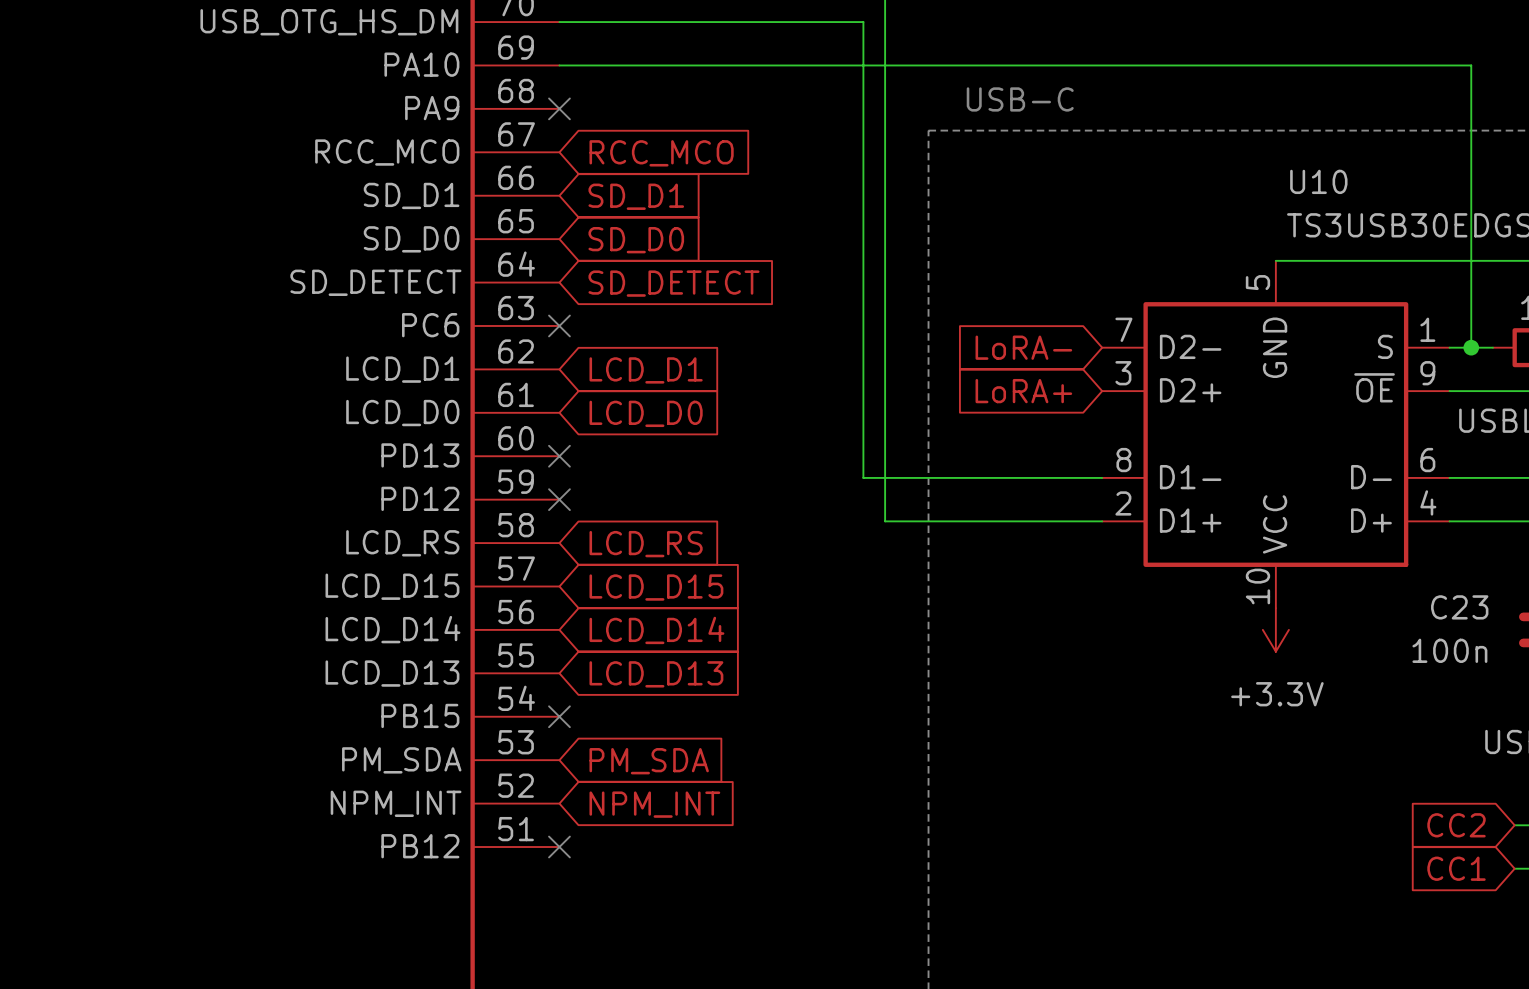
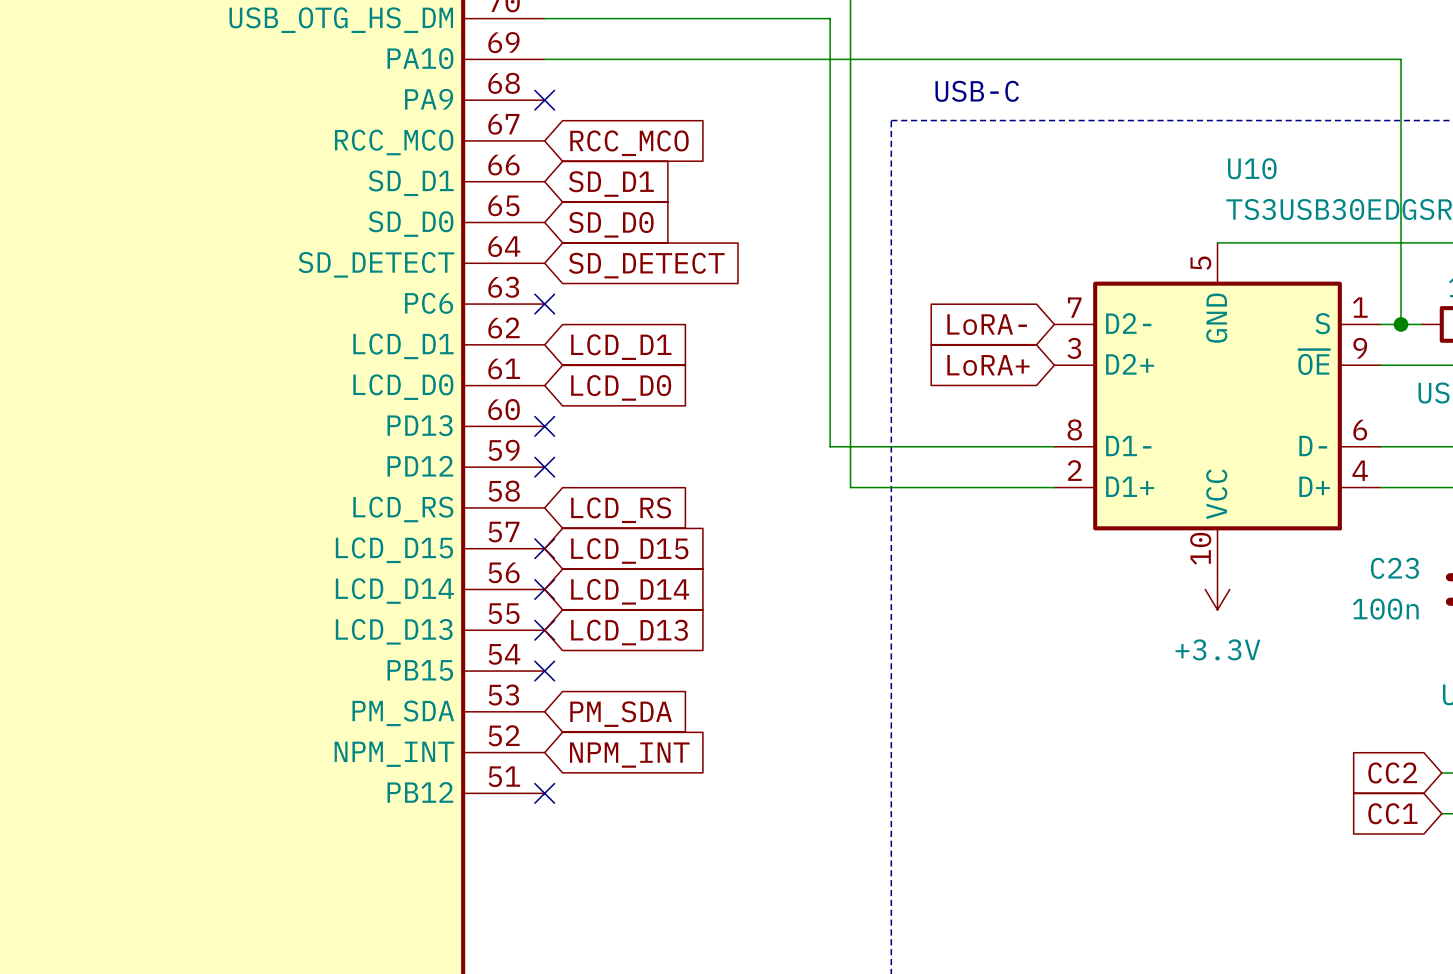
no-connect mark: none -> (544, 548)
no-connect mark: none -> (544, 589)
no-connect mark: none -> (544, 630)

